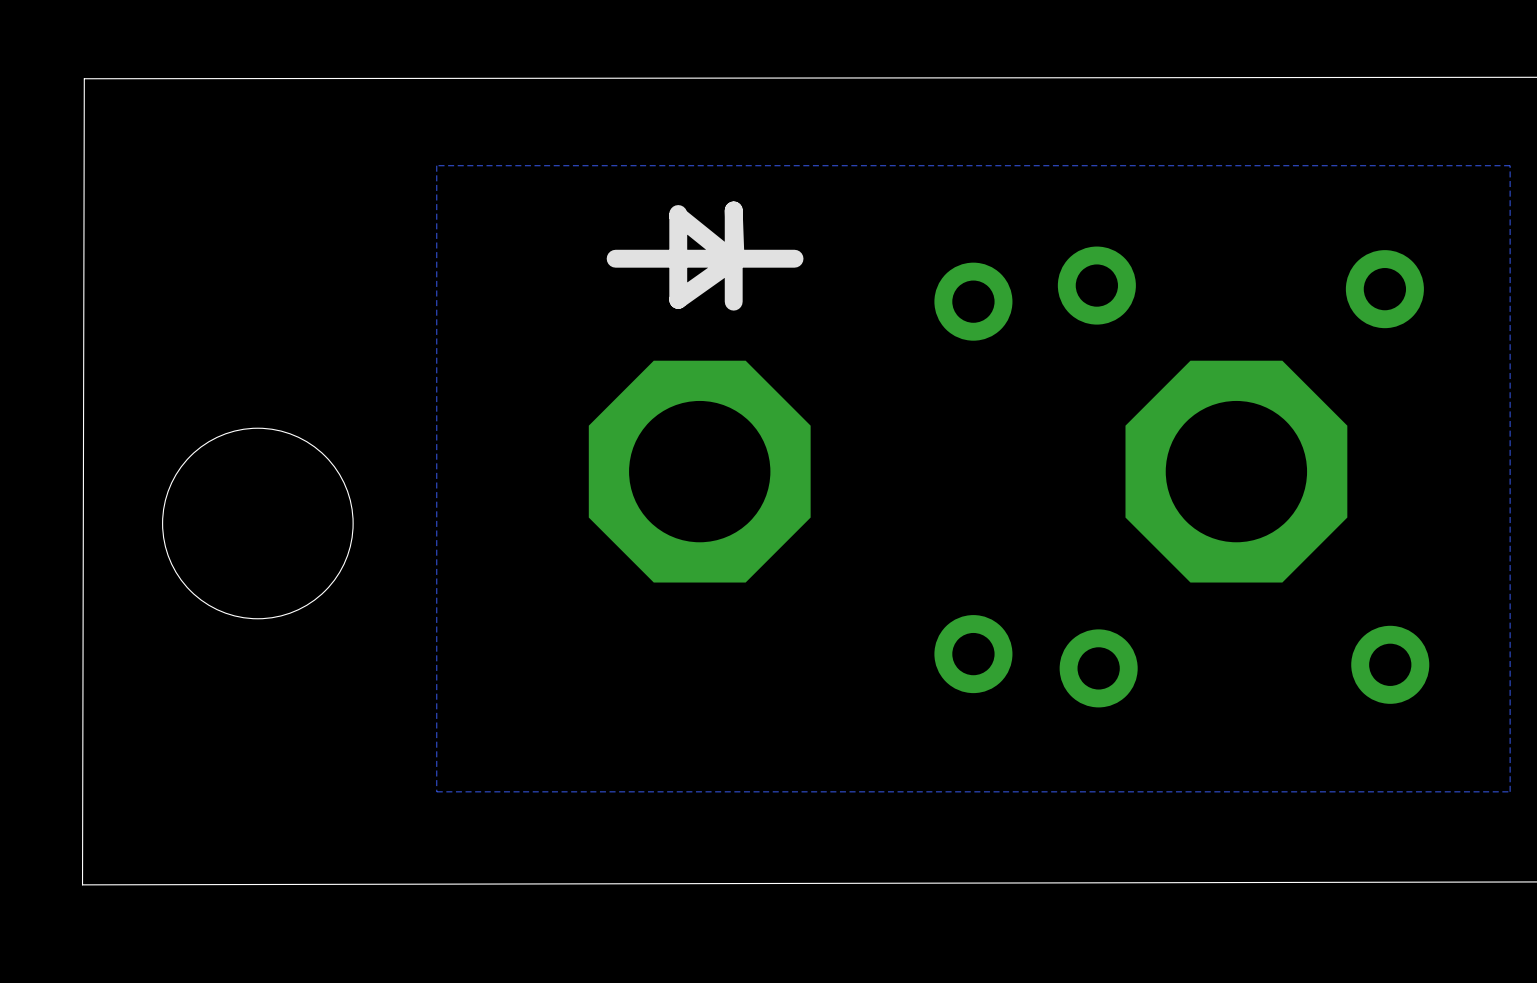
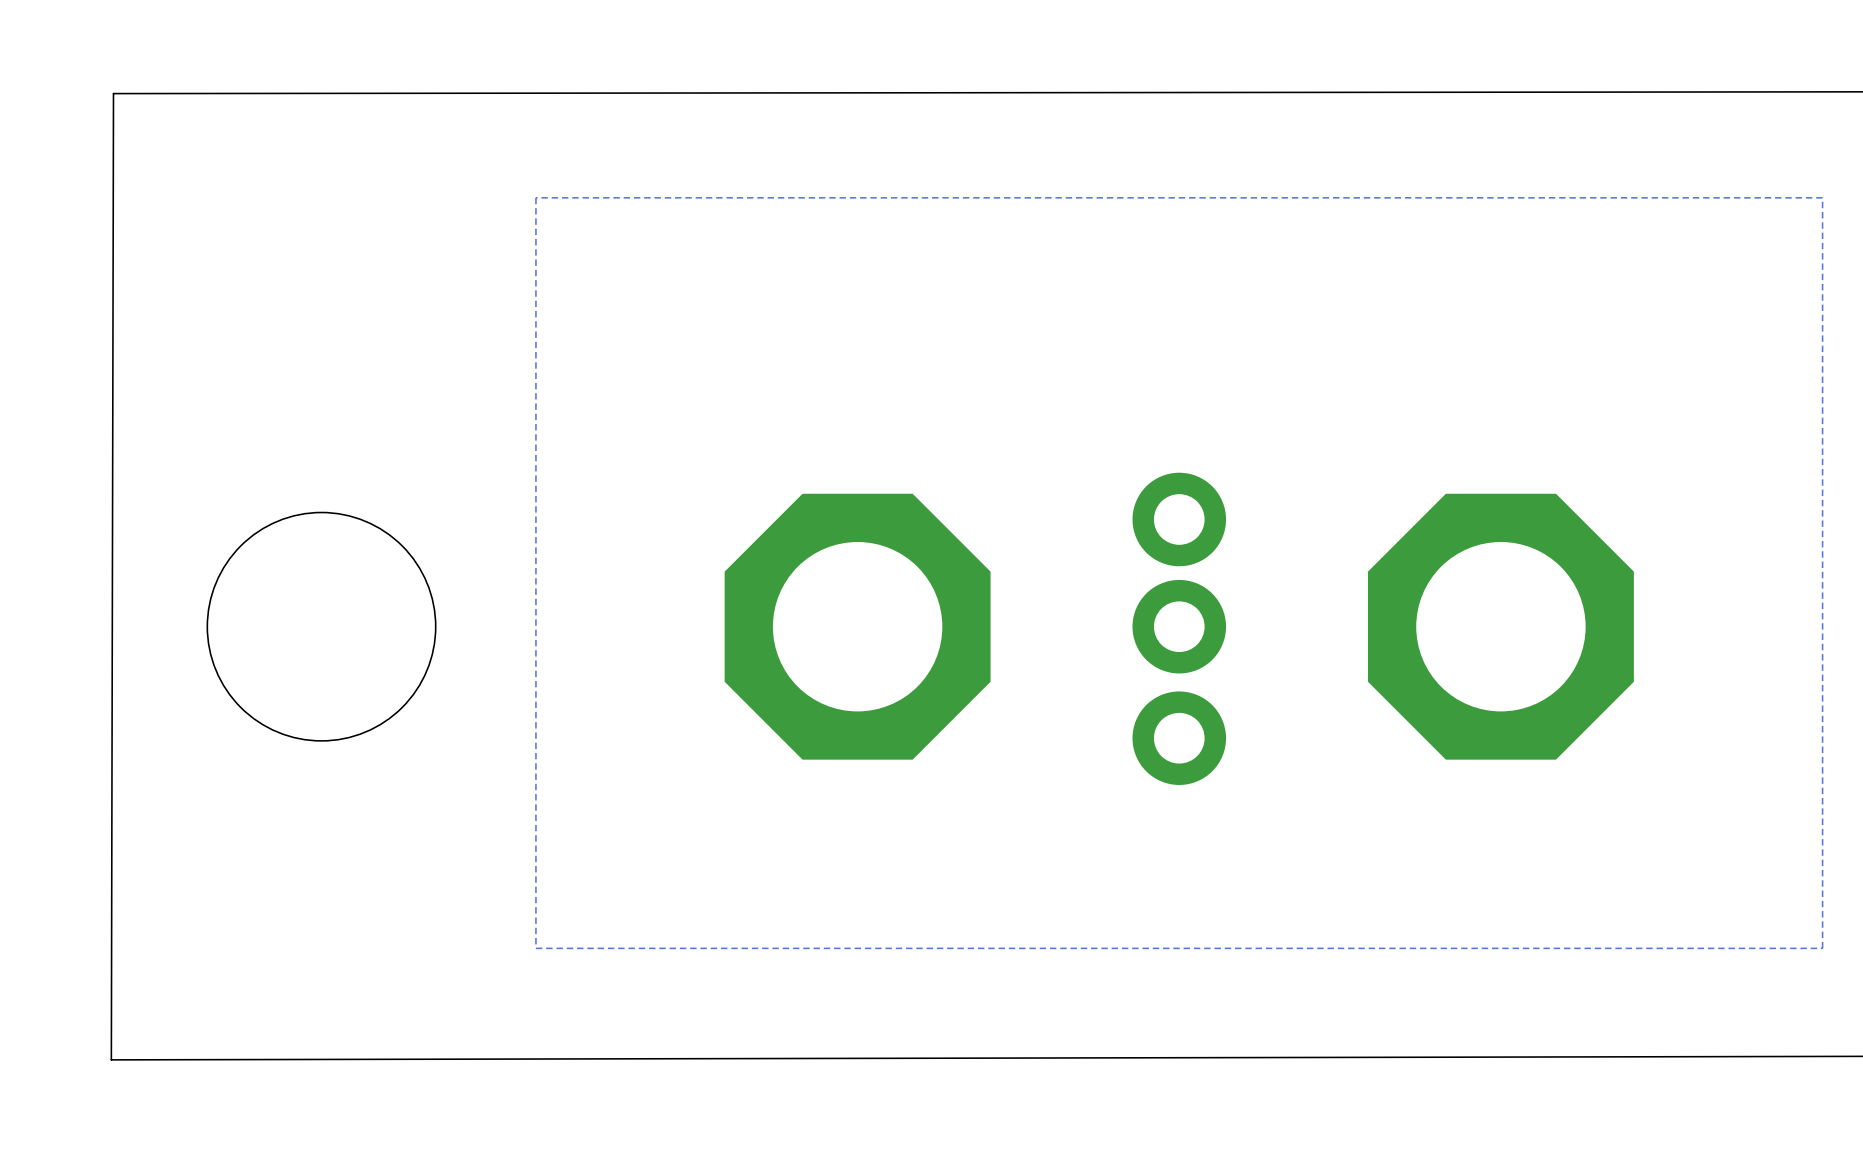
line: (678, 214) (678, 299) (733, 260) (678, 215) -> none
line: (735, 258) (733, 210) (733, 301) -> none
line: (794, 258) (615, 258) -> none
via: (1096, 285) -> none
via: (1384, 289) -> none
via: (973, 301) -> none
via: none -> (1179, 519)
part position: (699, 471) -> (857, 626)
part position: (1236, 471) -> (1500, 626)
via: none -> (1179, 626)
via position: (973, 654) -> (1179, 738)
via: (1390, 664) -> none
via: (1098, 668) -> none

